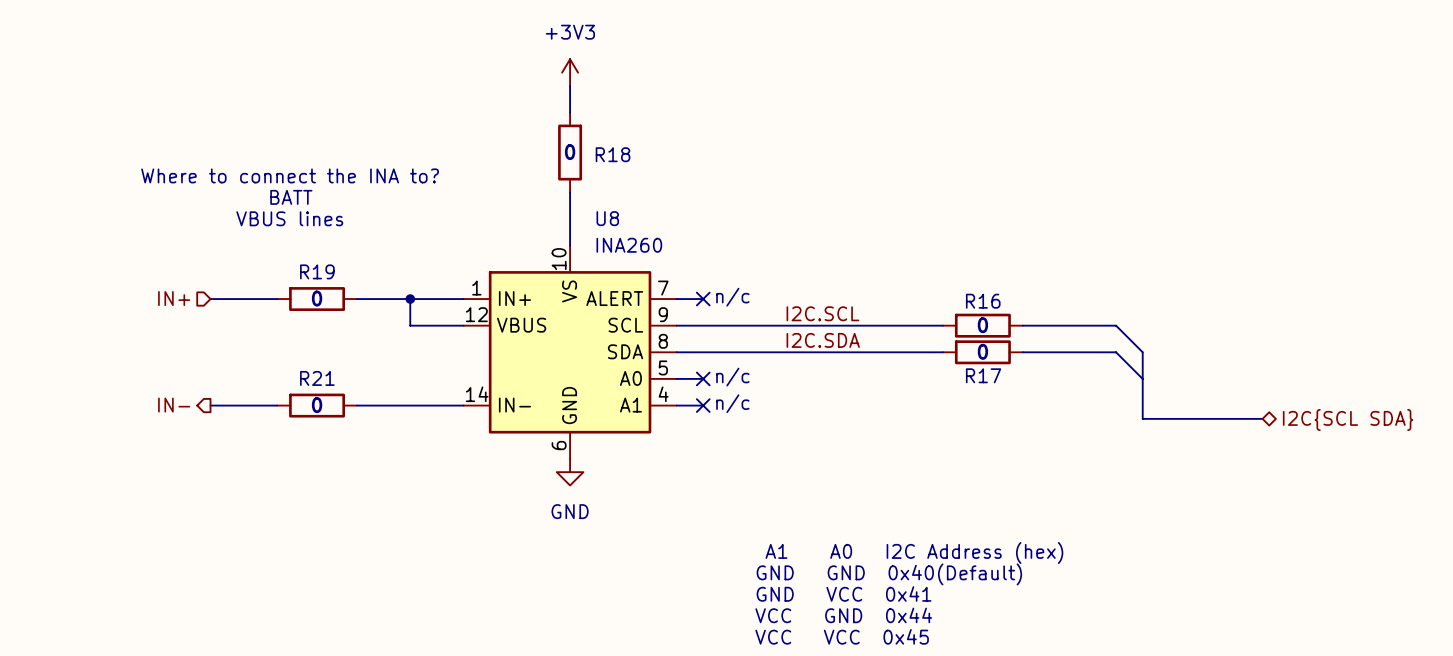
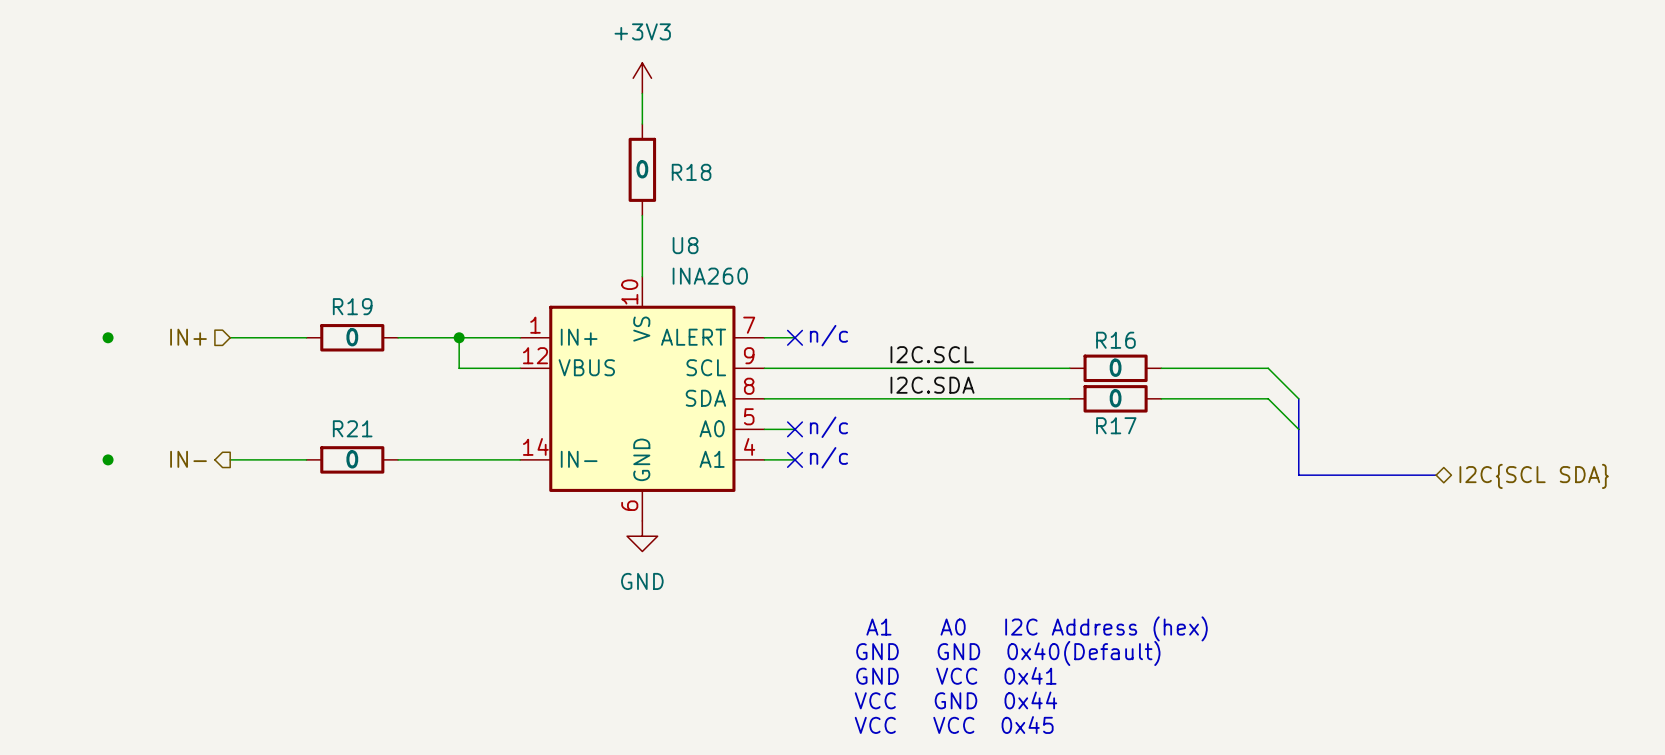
text: Where to connect the INA to? (290, 175) -> none
text: BATT (291, 197) -> none
text: VBUS lines (289, 218) -> none
junction: none -> (108, 337)
junction: none -> (108, 459)

